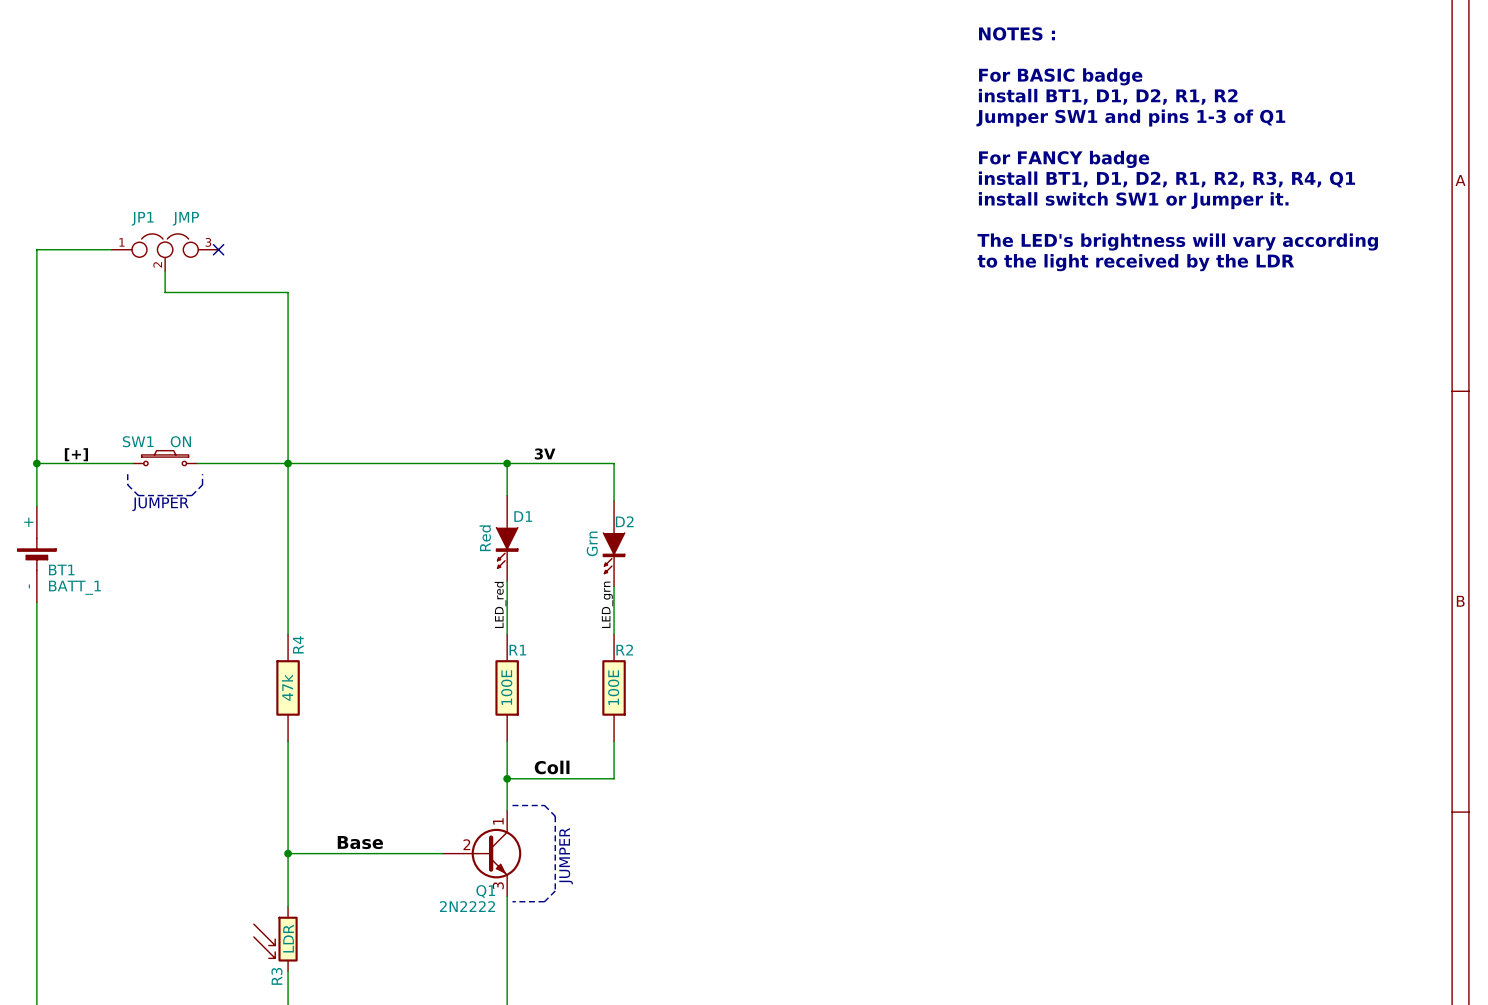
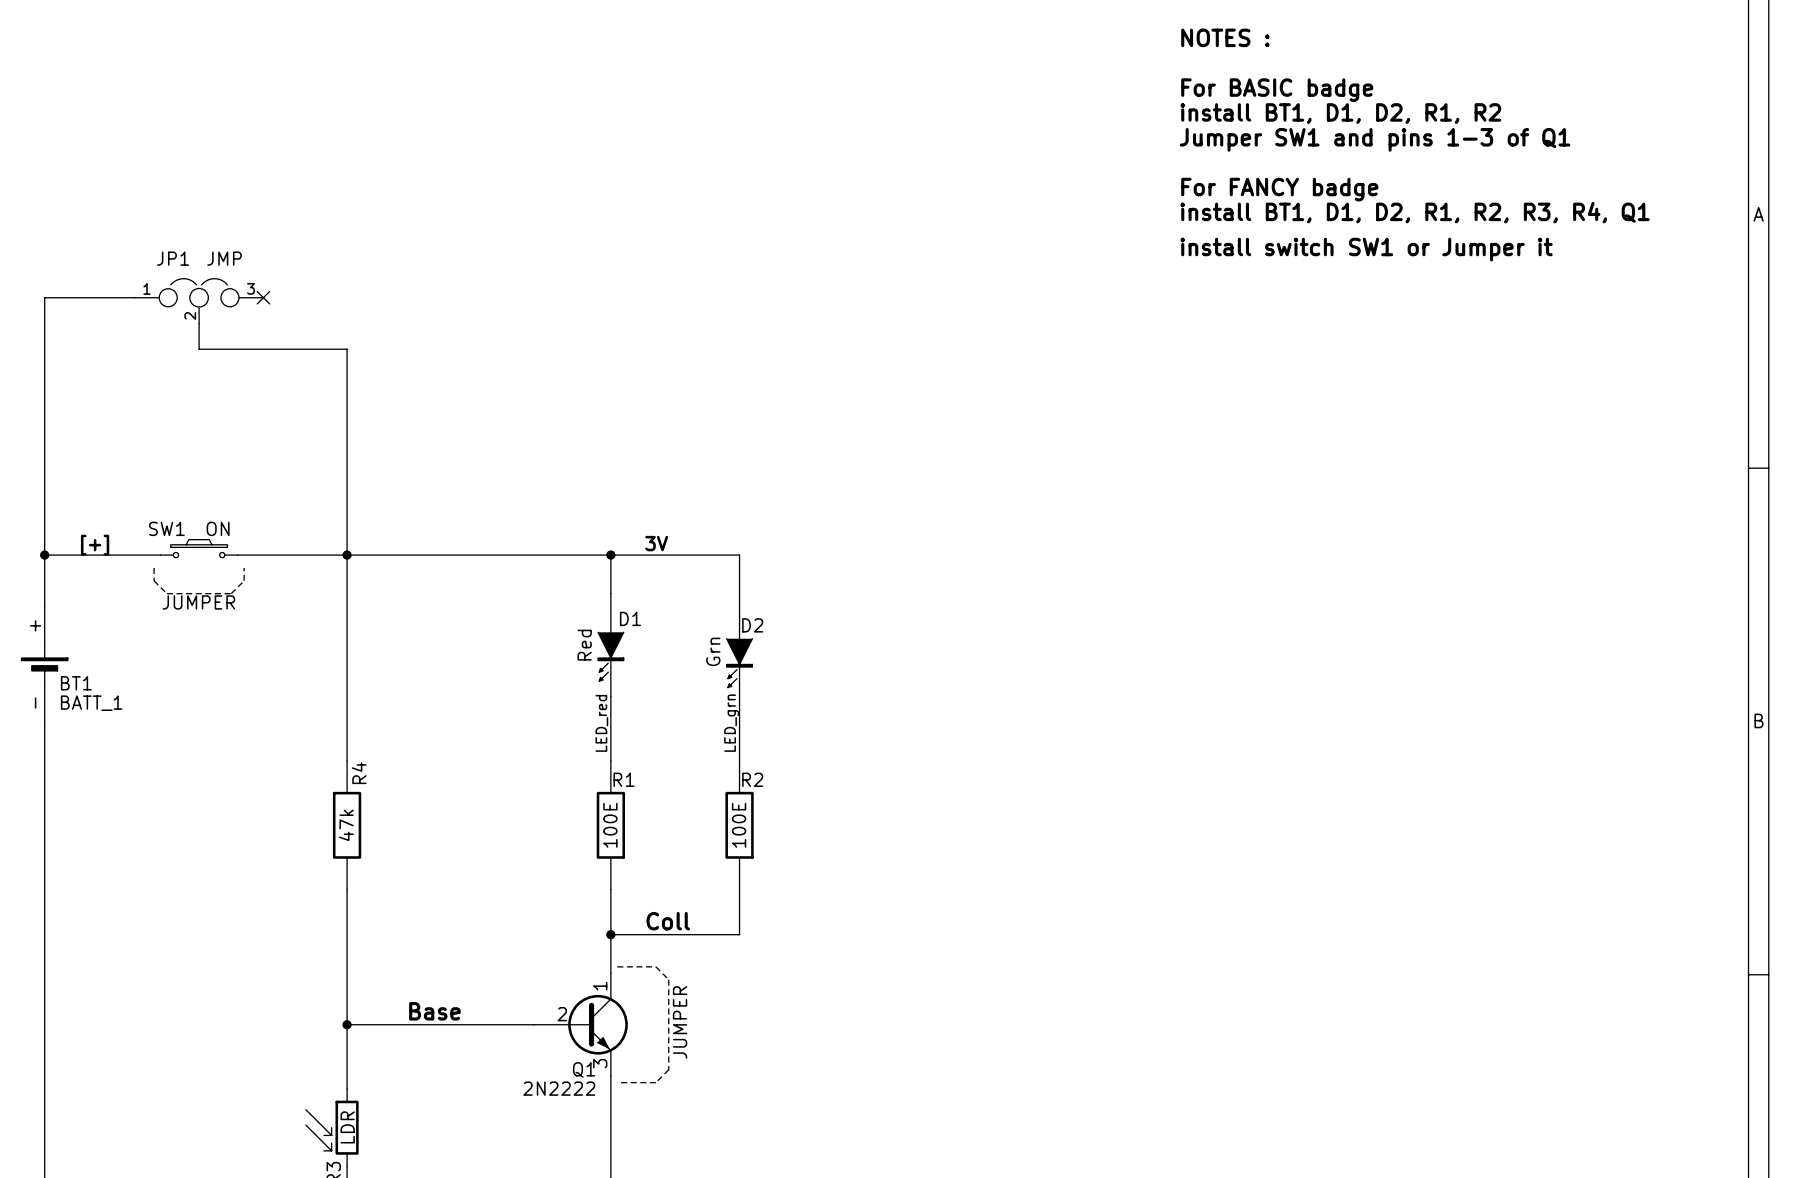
text: install switch SW1 or Jumper it. (1133, 200) -> install switch SW1 or Jumper it (1366, 249)
text: The LED's brightness will vary according (1177, 242) -> none
text: to the light received by the LDR (1135, 262) -> none

